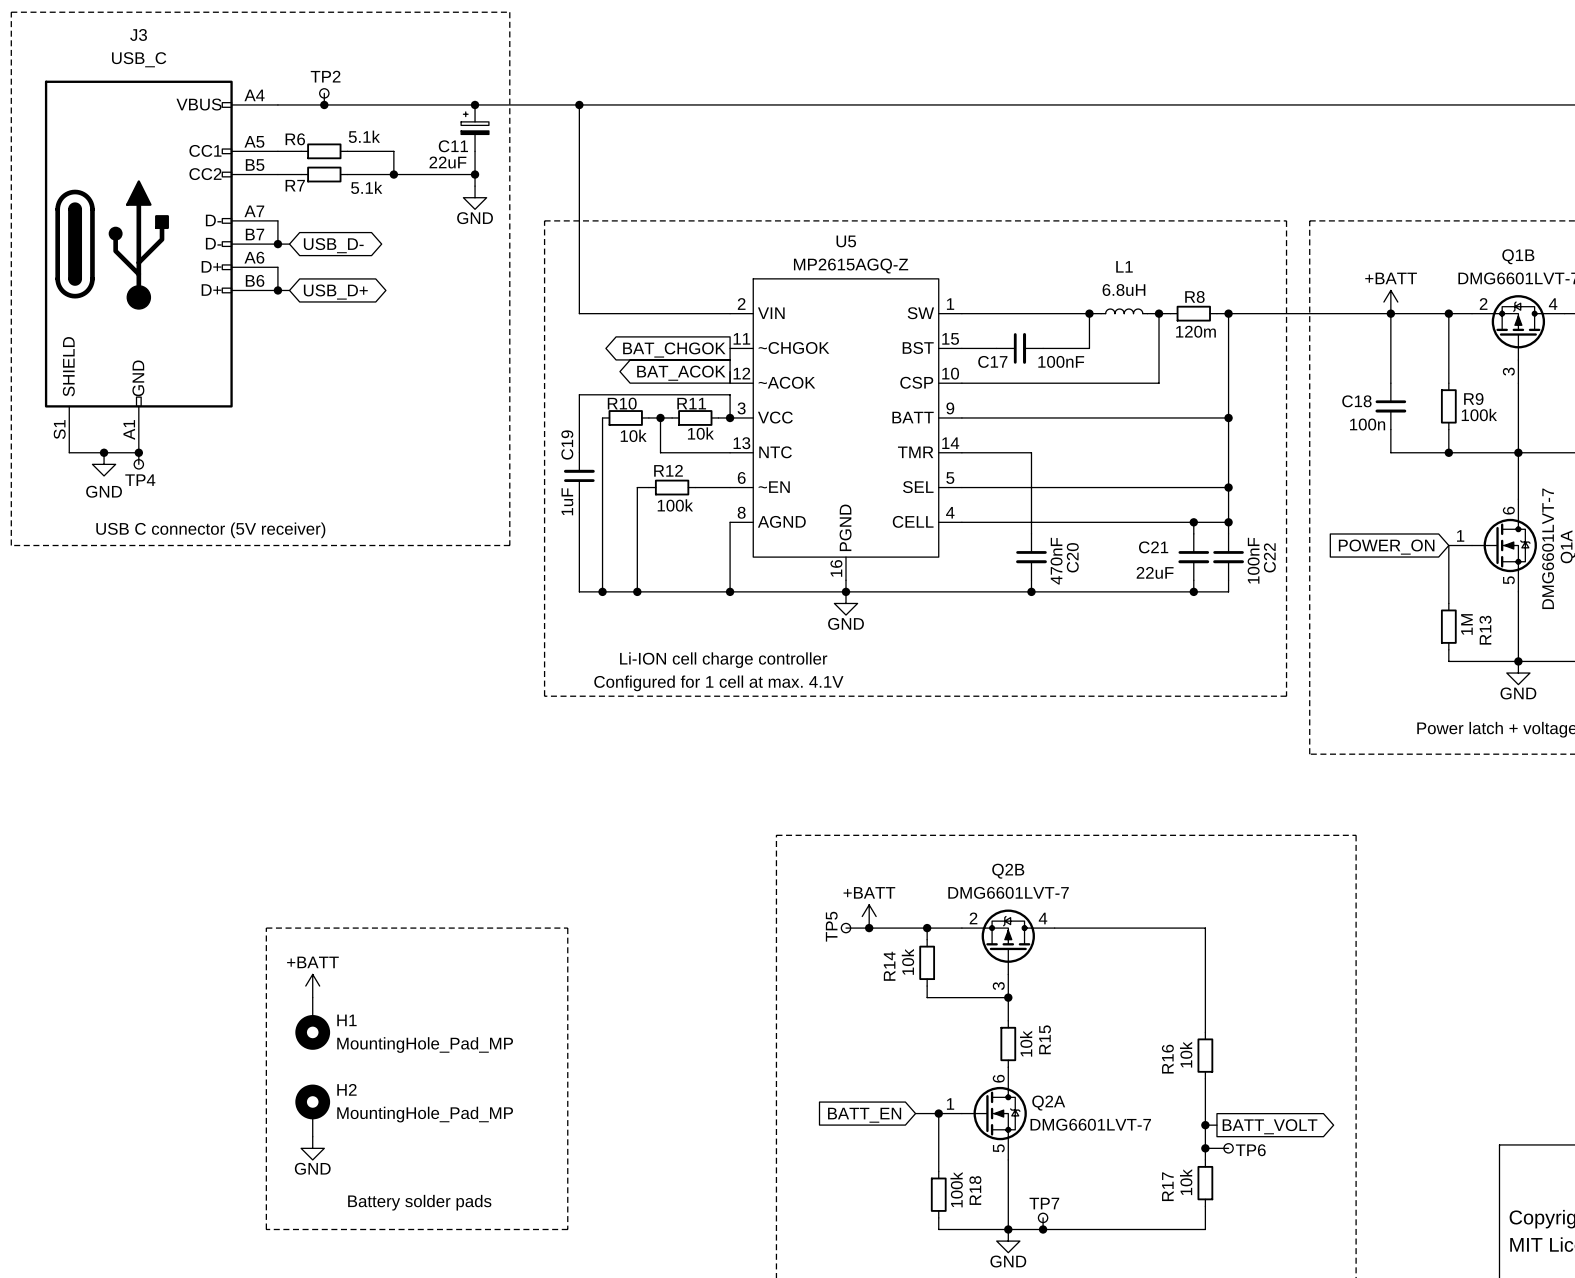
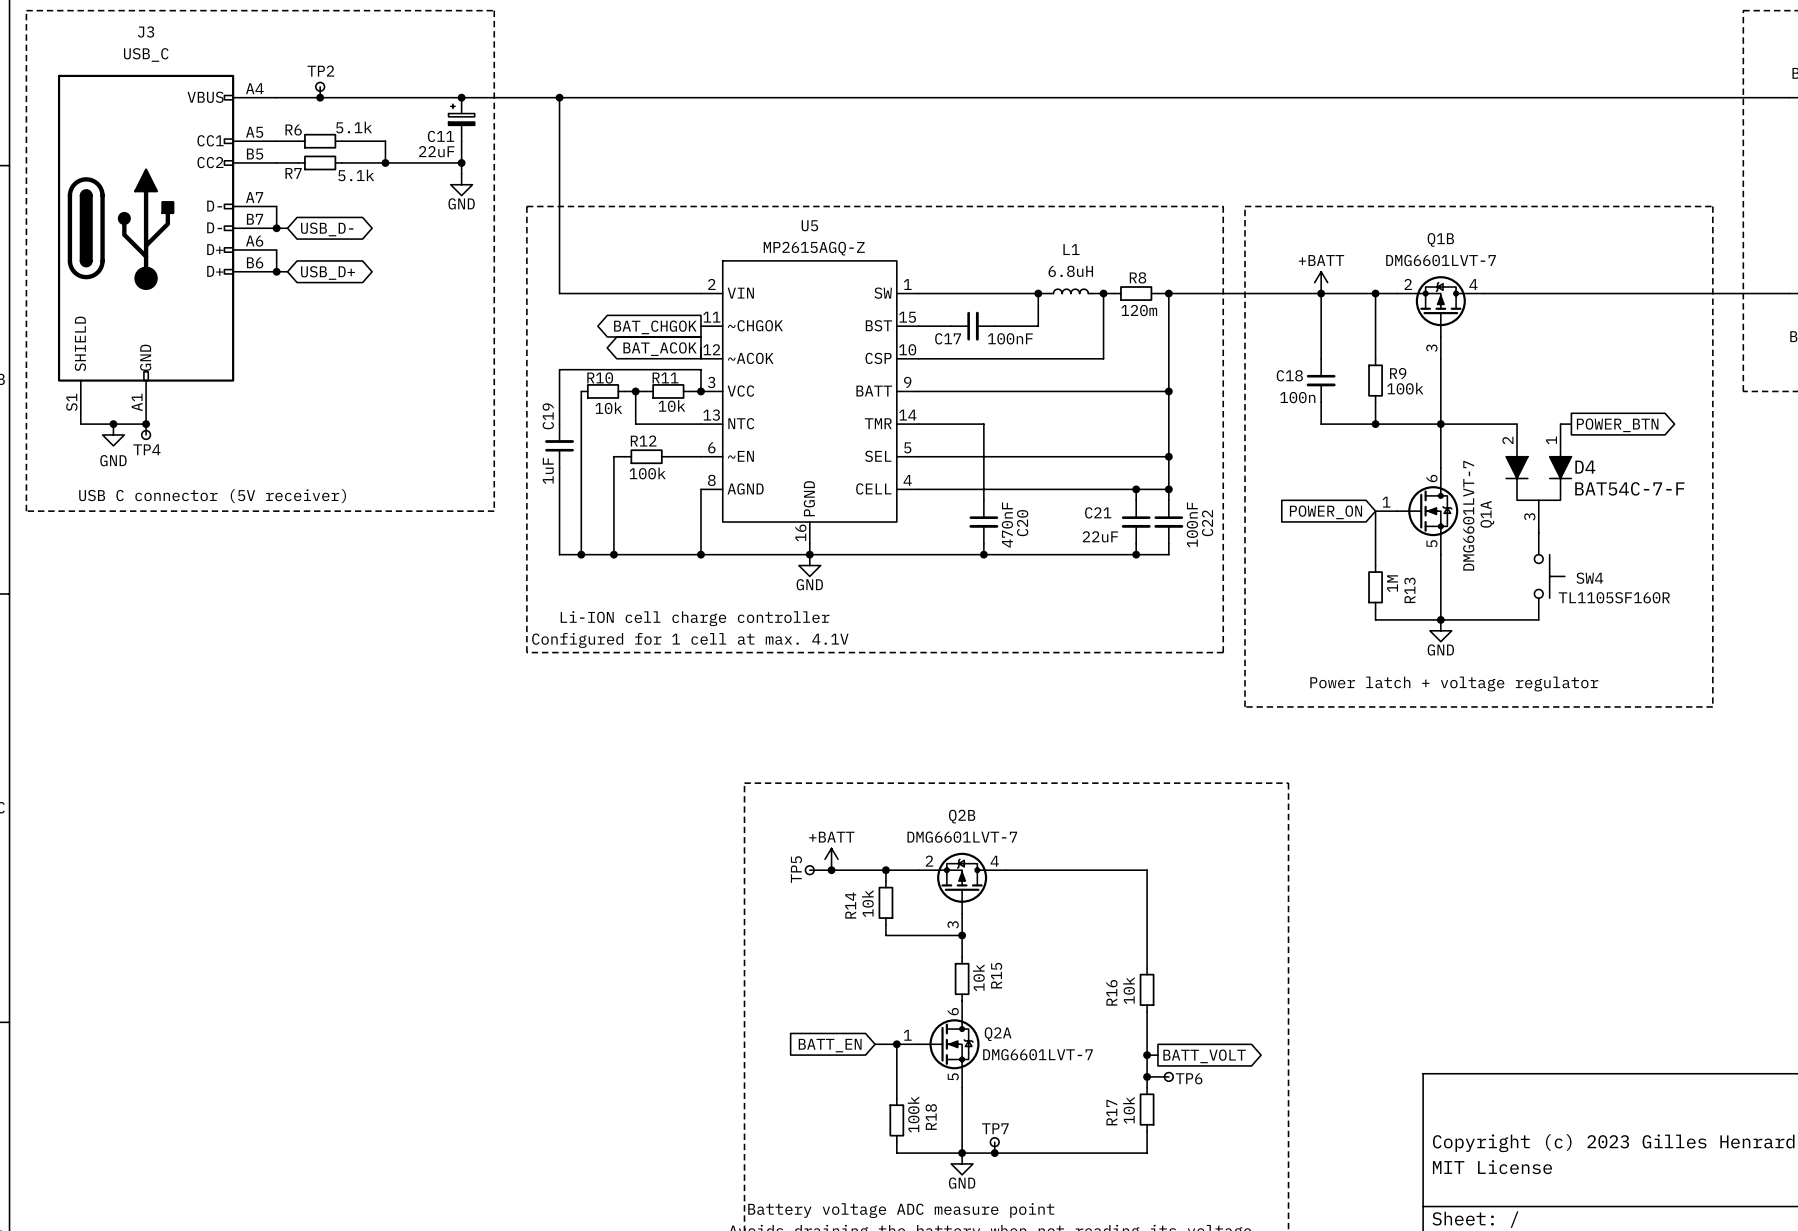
line: (266, 928) (567, 928) (567, 1229) (266, 1229) (266, 928) -> none
power symbol: +BATT (312, 986) -> none
H1: MountingHole_Pad_MP (312, 1023) -> none
H2: MountingHole_Pad_MP (312, 1110) -> none
power symbol: GND (312, 1148) -> none
text: Battery solder pads (419, 1202) -> none

